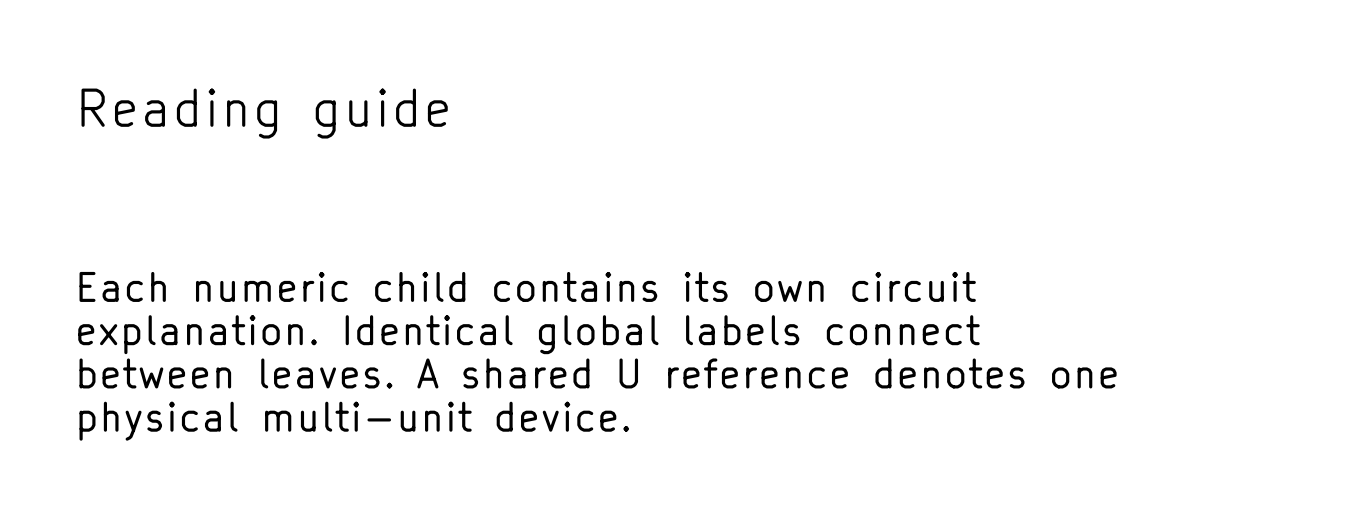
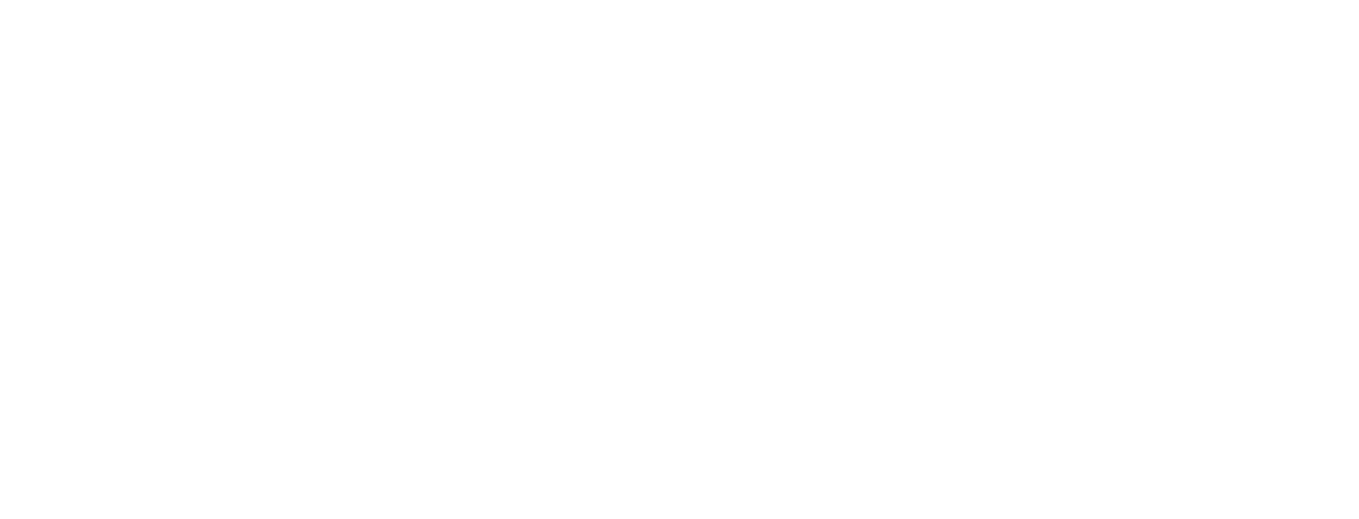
text: Reading guide (264, 113) -> none
text: Each numeric child contains its own circuit (527, 286) -> none
text: explanation. Identical global labels connect (528, 334) -> none
text: between leaves. A shared U reference denotes one (598, 373) -> none
text: physical multi-unit device. (354, 421) -> none

